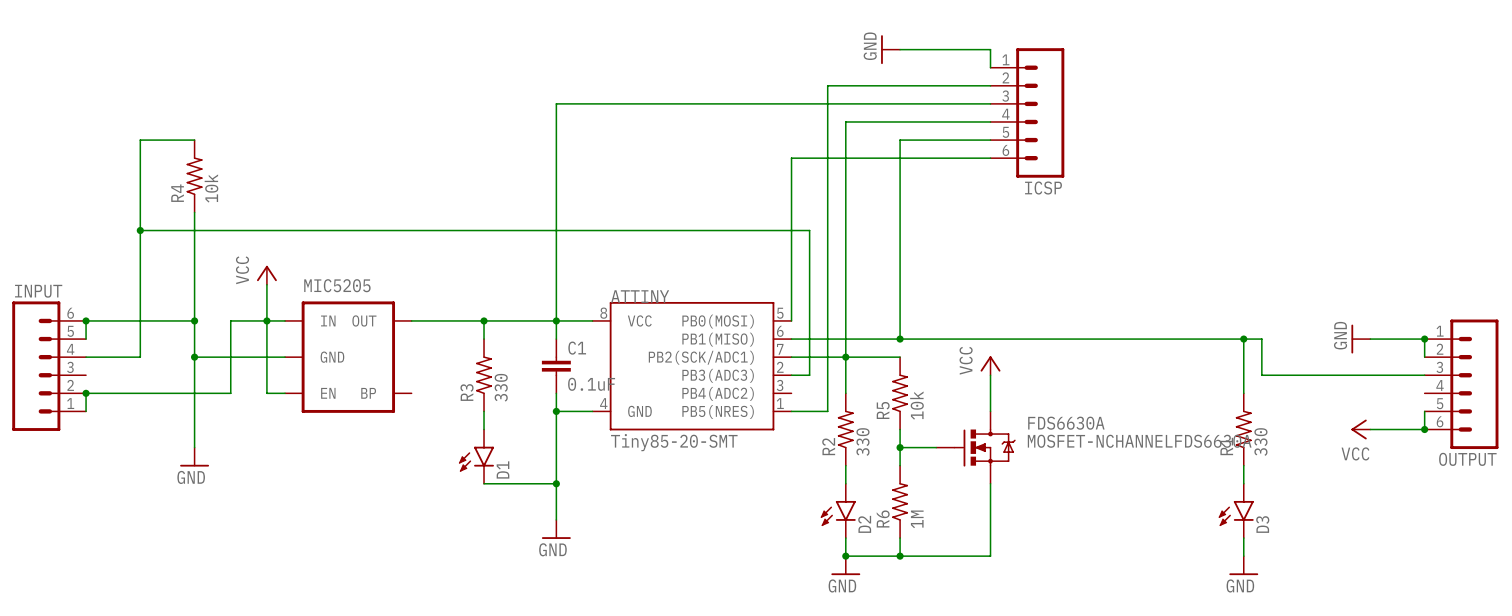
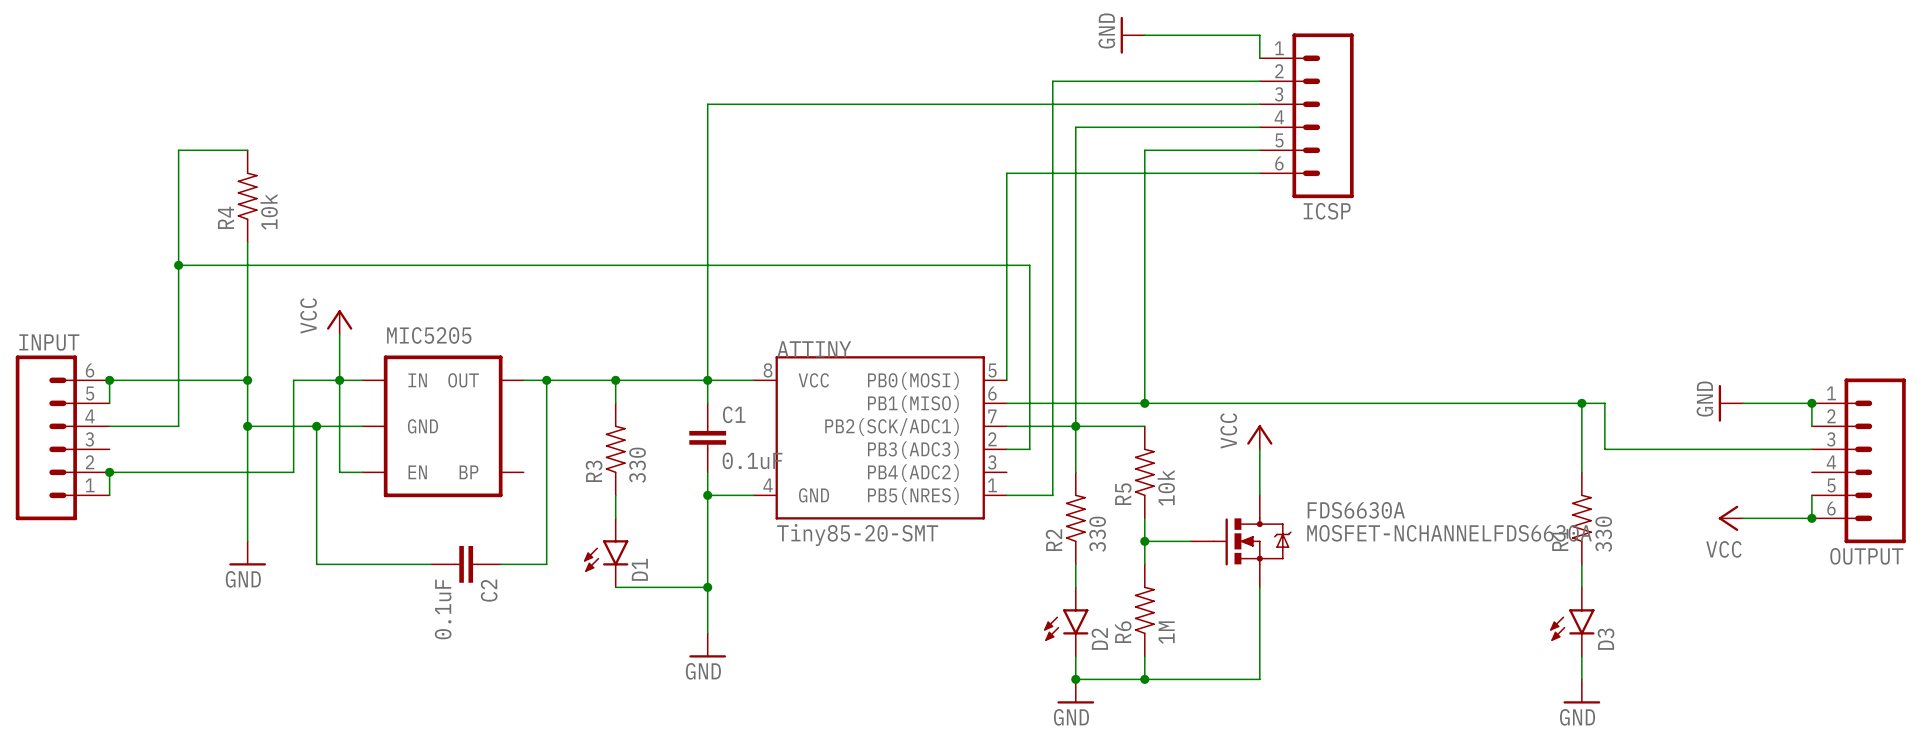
wire: none -> (546, 380) (546, 564) (500, 564)
junction: none -> (546, 380)
wire: none -> (316, 426) (316, 564) (431, 564)
junction: none -> (316, 426)
C2: none -> 0.1uF (466, 564)

